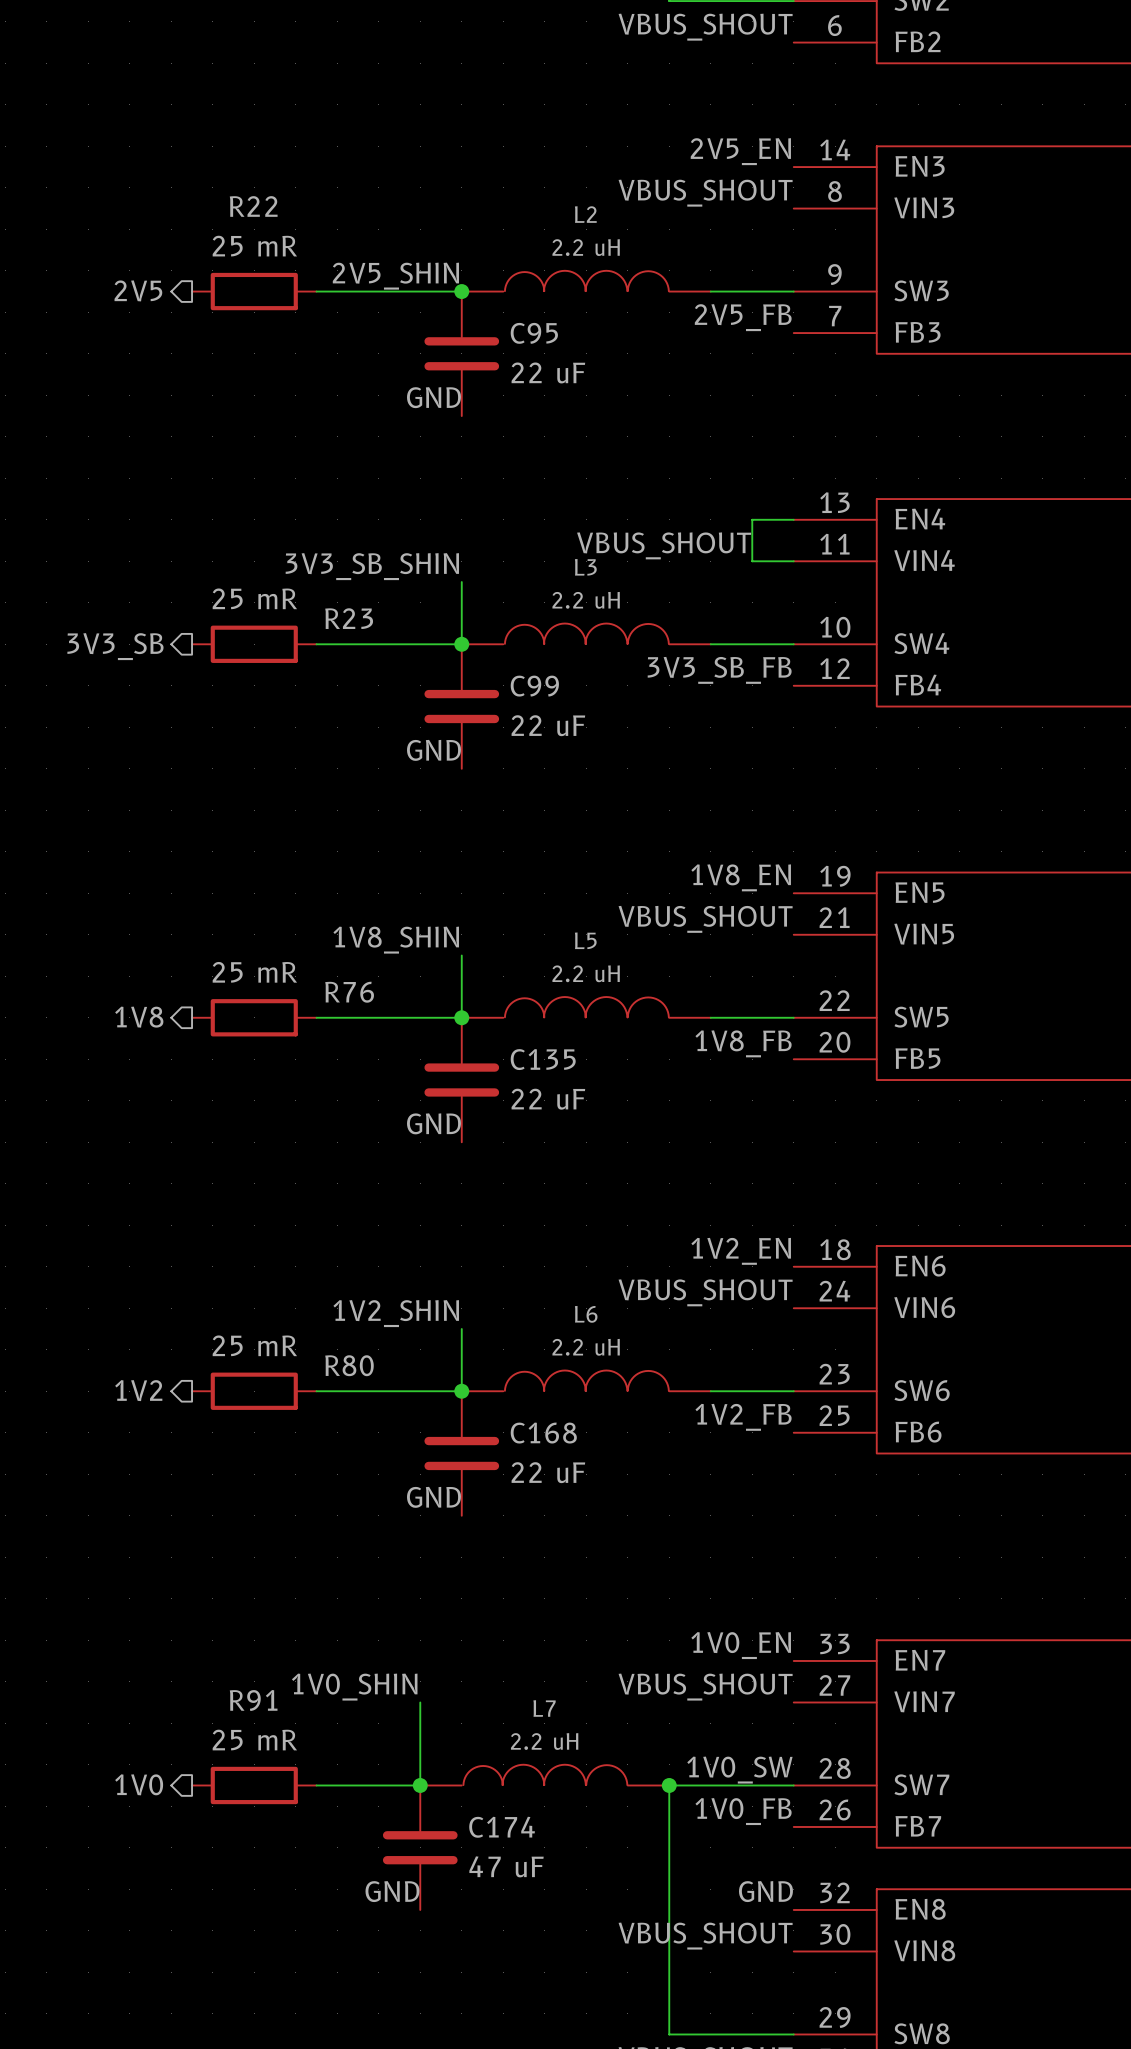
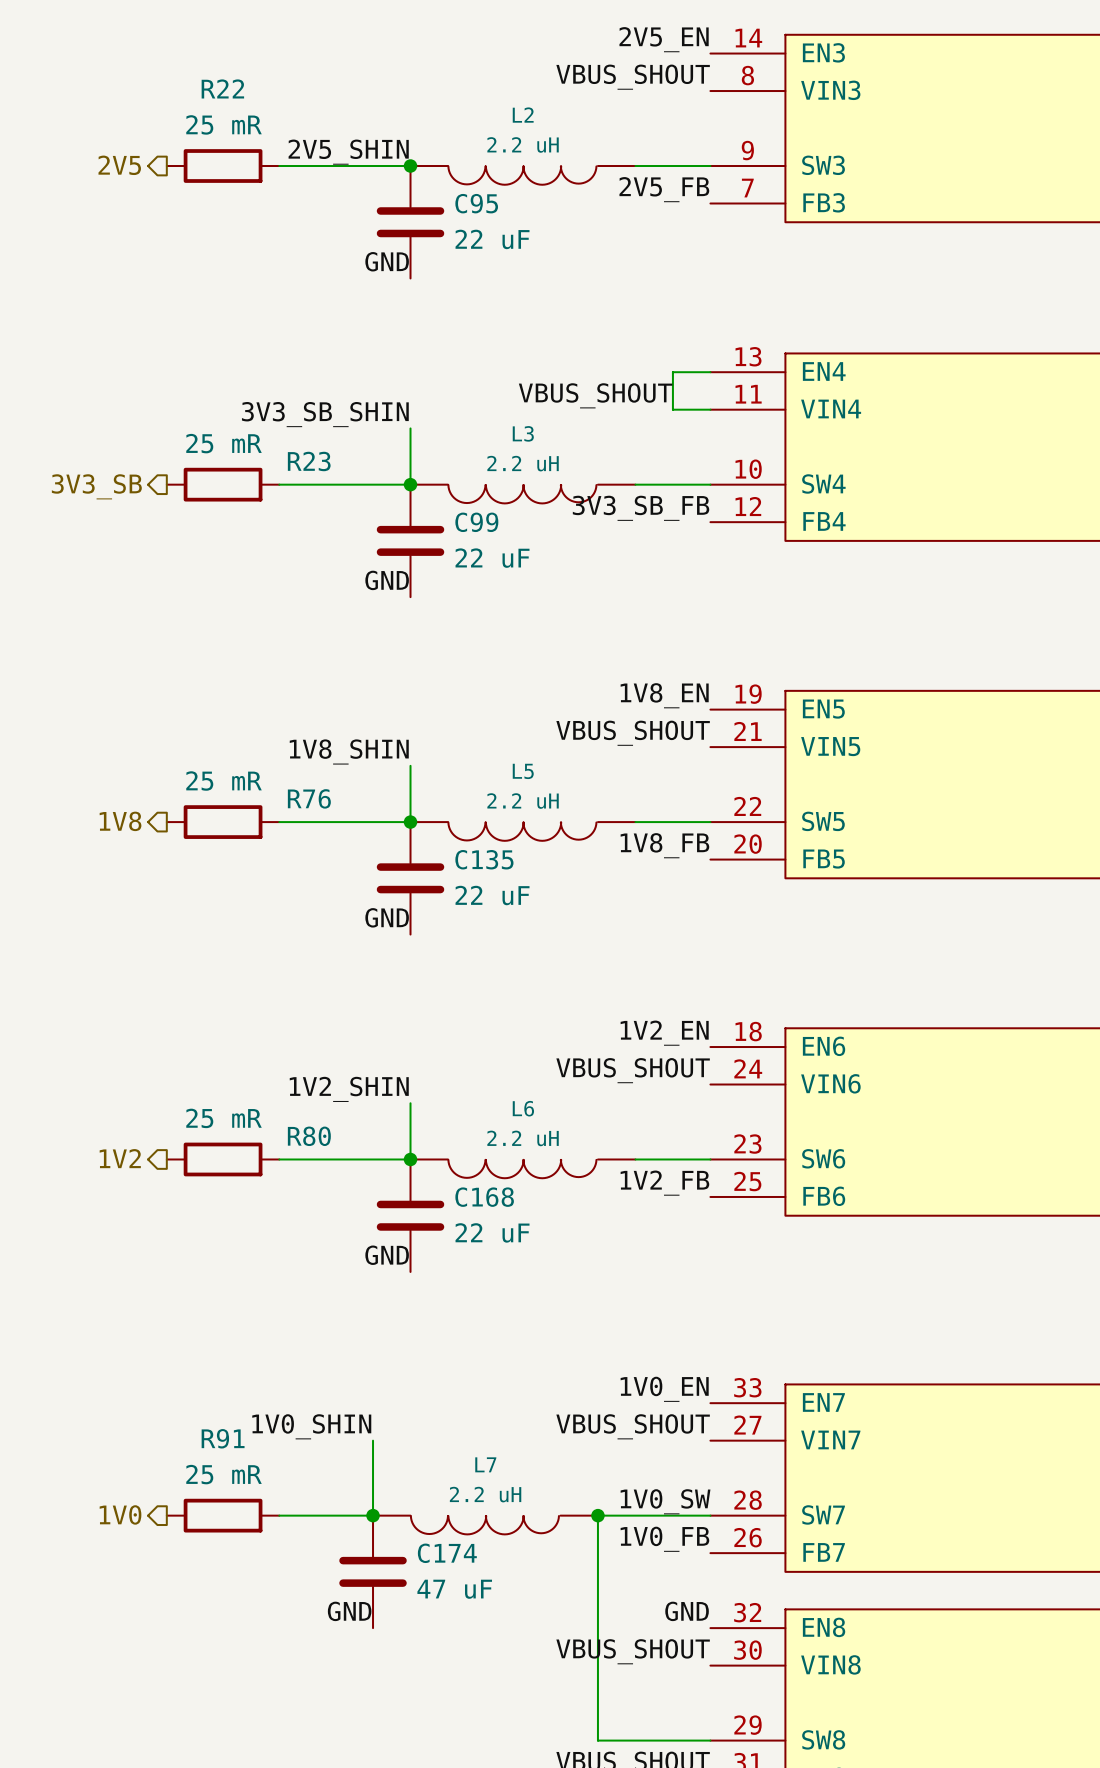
L2 rotation: 0° (586, 280) -> 180° (522, 175)
L3 rotation: 0° (586, 633) -> 180° (522, 494)
L5 rotation: 0° (586, 1007) -> 180° (522, 831)
L6 rotation: 0° (586, 1380) -> 180° (522, 1169)
L7 rotation: 0° (545, 1774) -> 180° (484, 1525)

